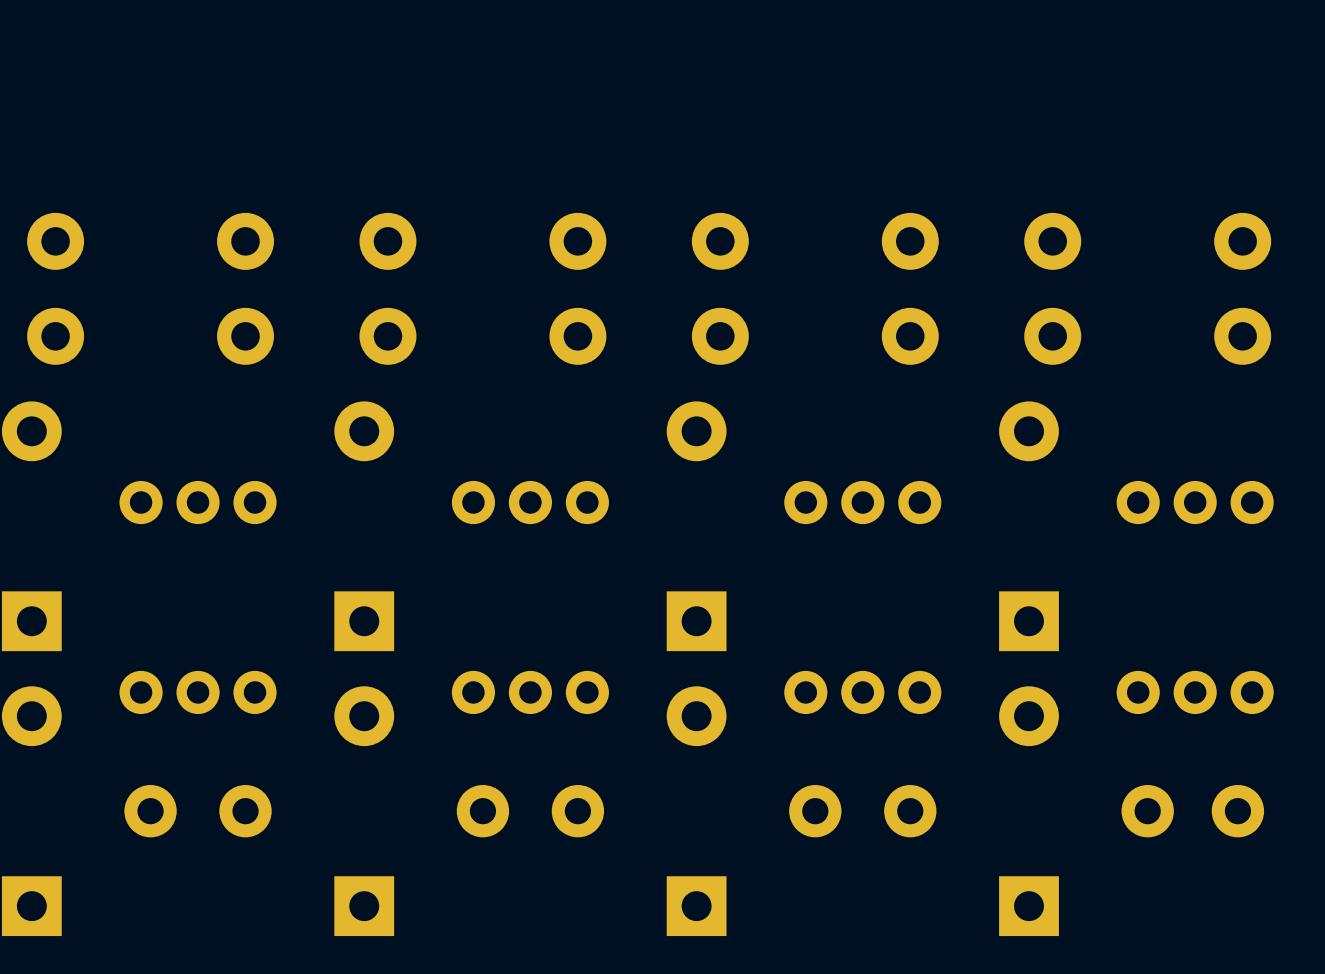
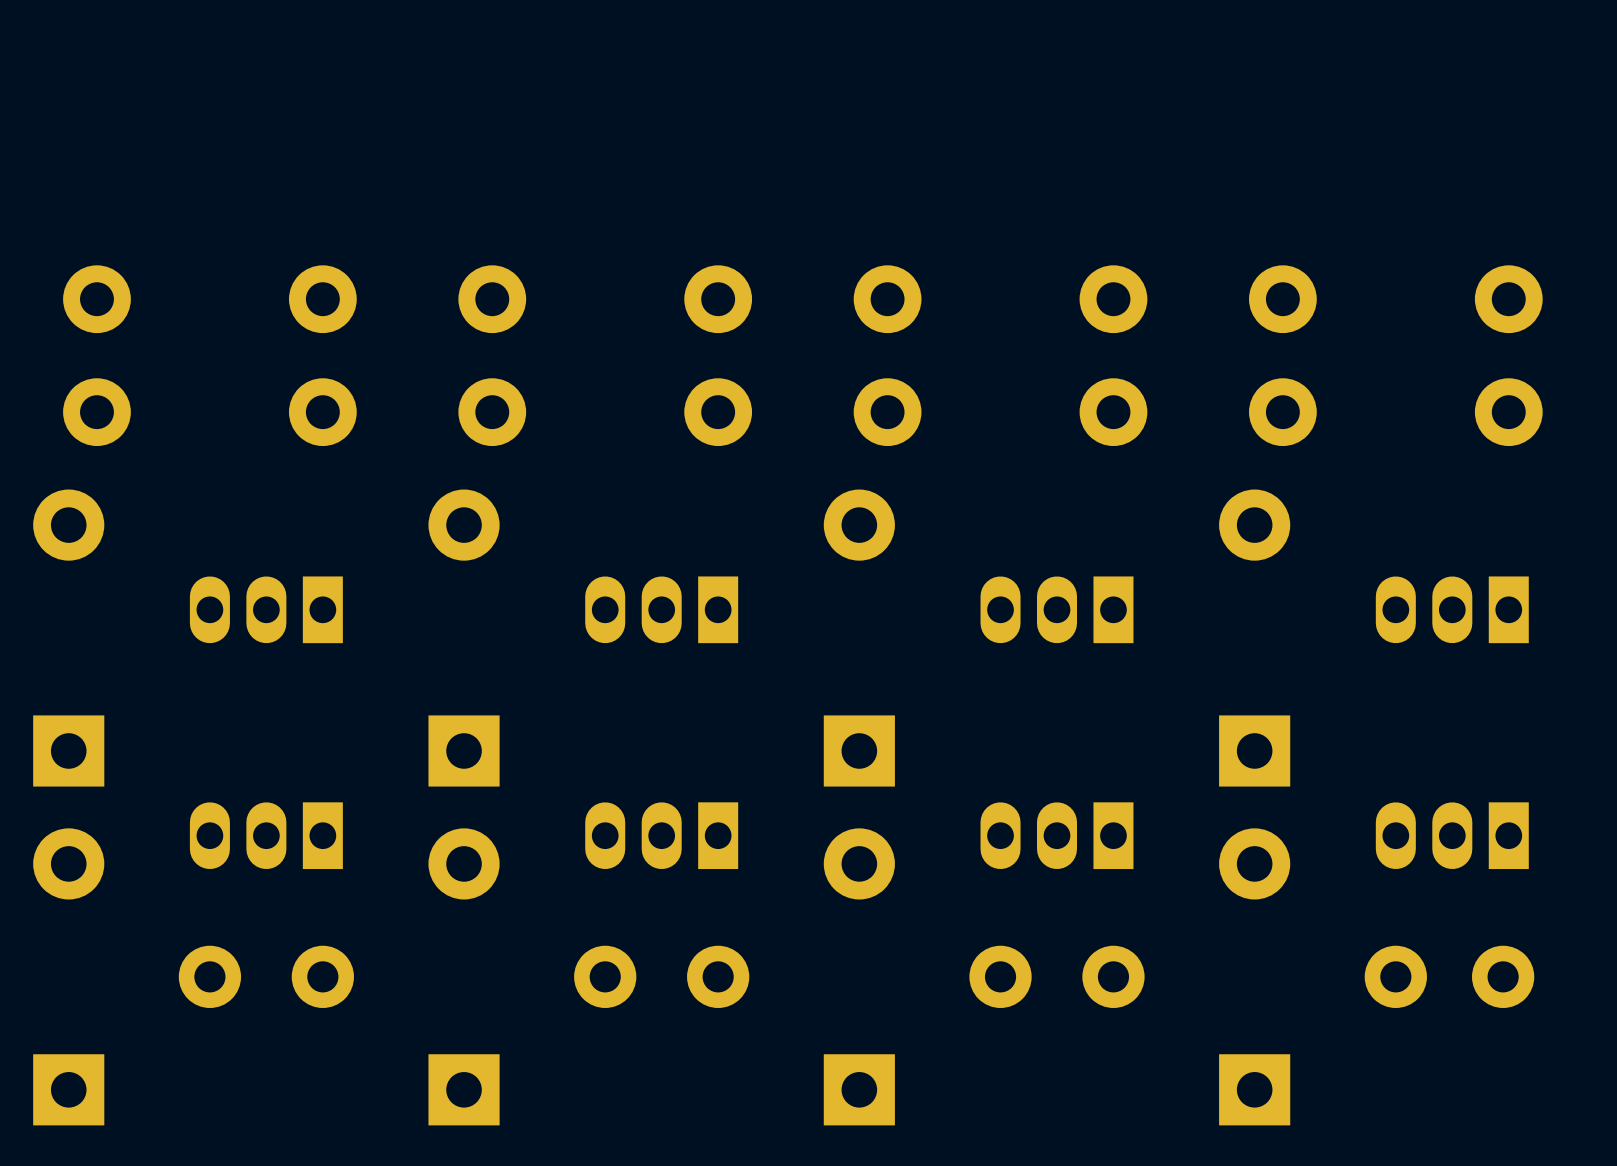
part footprint: [119, 480, 277, 525] -> [189, 576, 343, 644]
part footprint: [451, 480, 609, 525] -> [585, 576, 739, 644]
part footprint: [784, 480, 942, 525] -> [980, 576, 1134, 644]
part footprint: [1116, 480, 1274, 525] -> [1375, 576, 1529, 644]
part footprint: [119, 670, 277, 715] -> [189, 802, 343, 870]
part footprint: [451, 670, 609, 715] -> [585, 802, 739, 870]
part footprint: [784, 670, 942, 715] -> [980, 802, 1134, 870]
part footprint: [1116, 670, 1274, 715] -> [1375, 802, 1529, 870]

